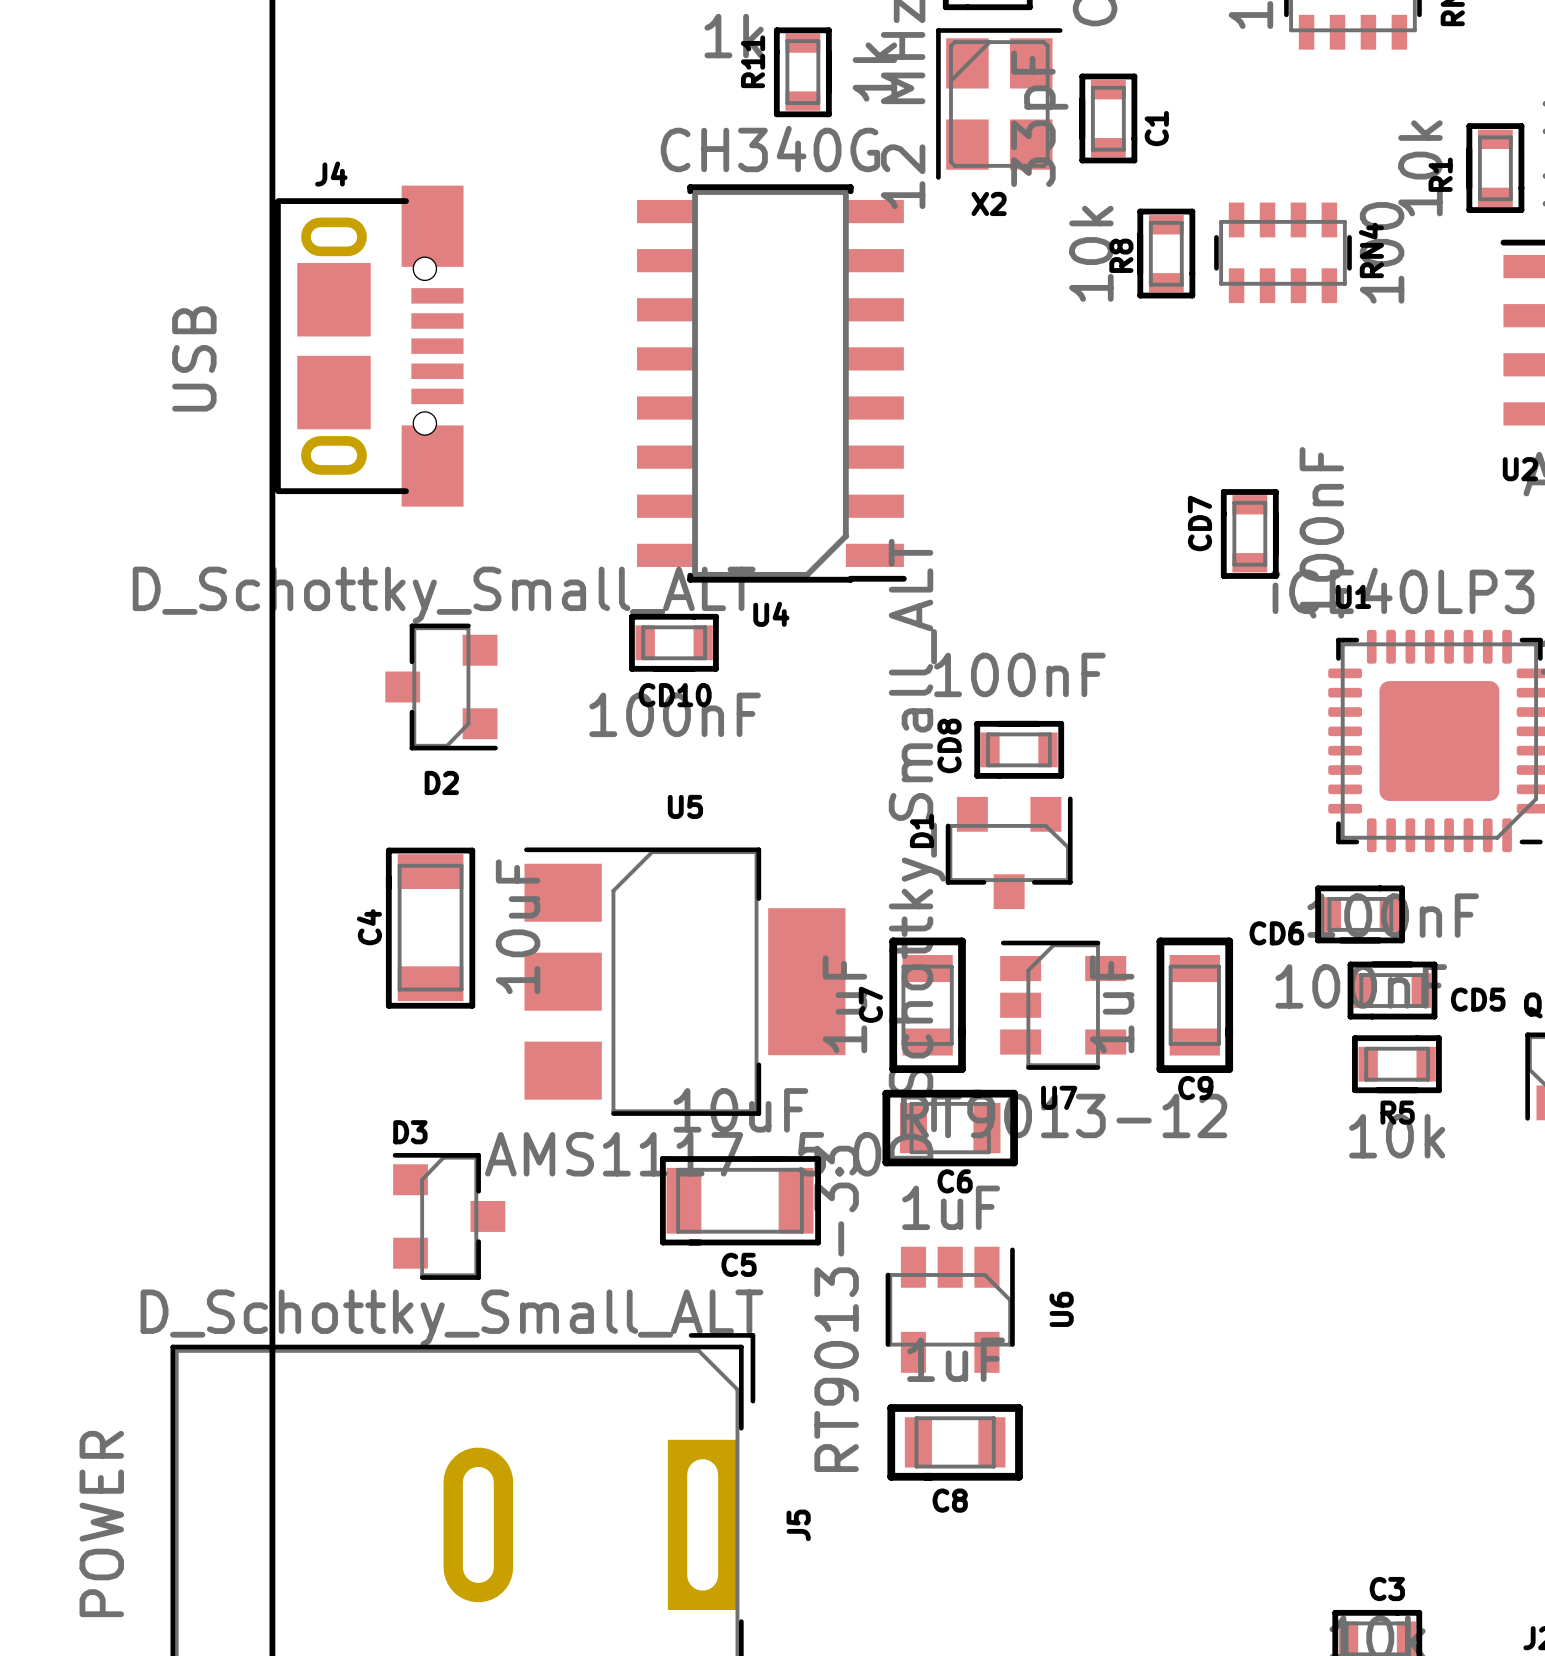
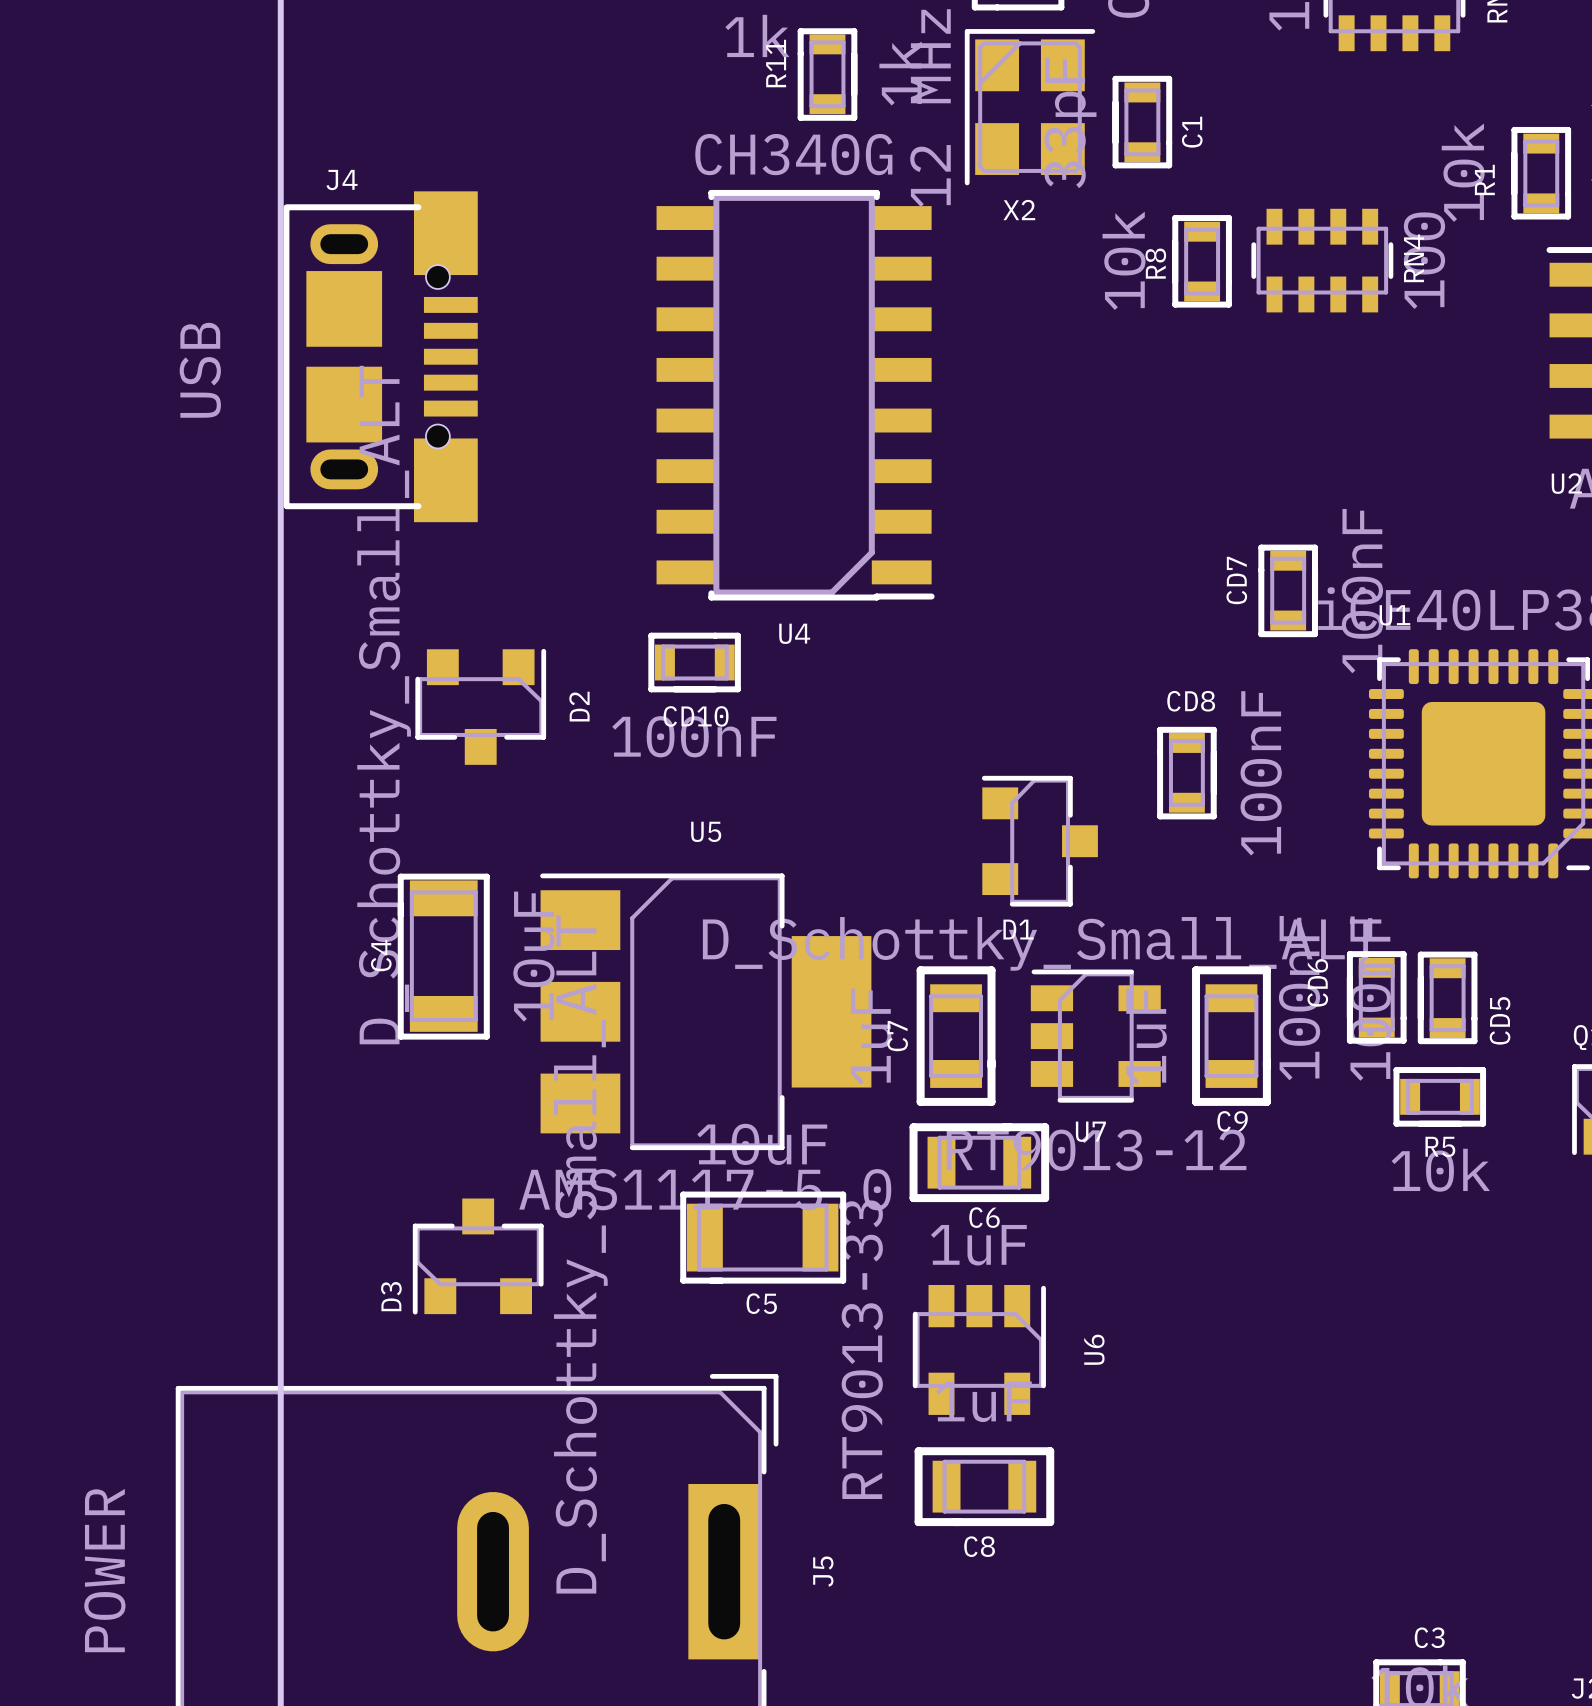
CD7 position: (1249, 534) -> (1288, 590)
D2 rotation: 0° (441, 686) -> 90° counterclockwise (480, 706)
CD8 rotation: 0° (1019, 749) -> 90° clockwise (1186, 773)
CD8 position: (1019, 749) -> (1186, 773)
D1 rotation: 0° (1009, 852) -> 90° counterclockwise (1039, 841)
CD6 rotation: 0° (1360, 914) -> 90° clockwise (1376, 997)
CD6 position: (1360, 914) -> (1376, 997)
CD5 rotation: 0° (1392, 990) -> 90° counterclockwise (1447, 997)
D3 rotation: 0° (449, 1216) -> 90° counterclockwise (478, 1256)

